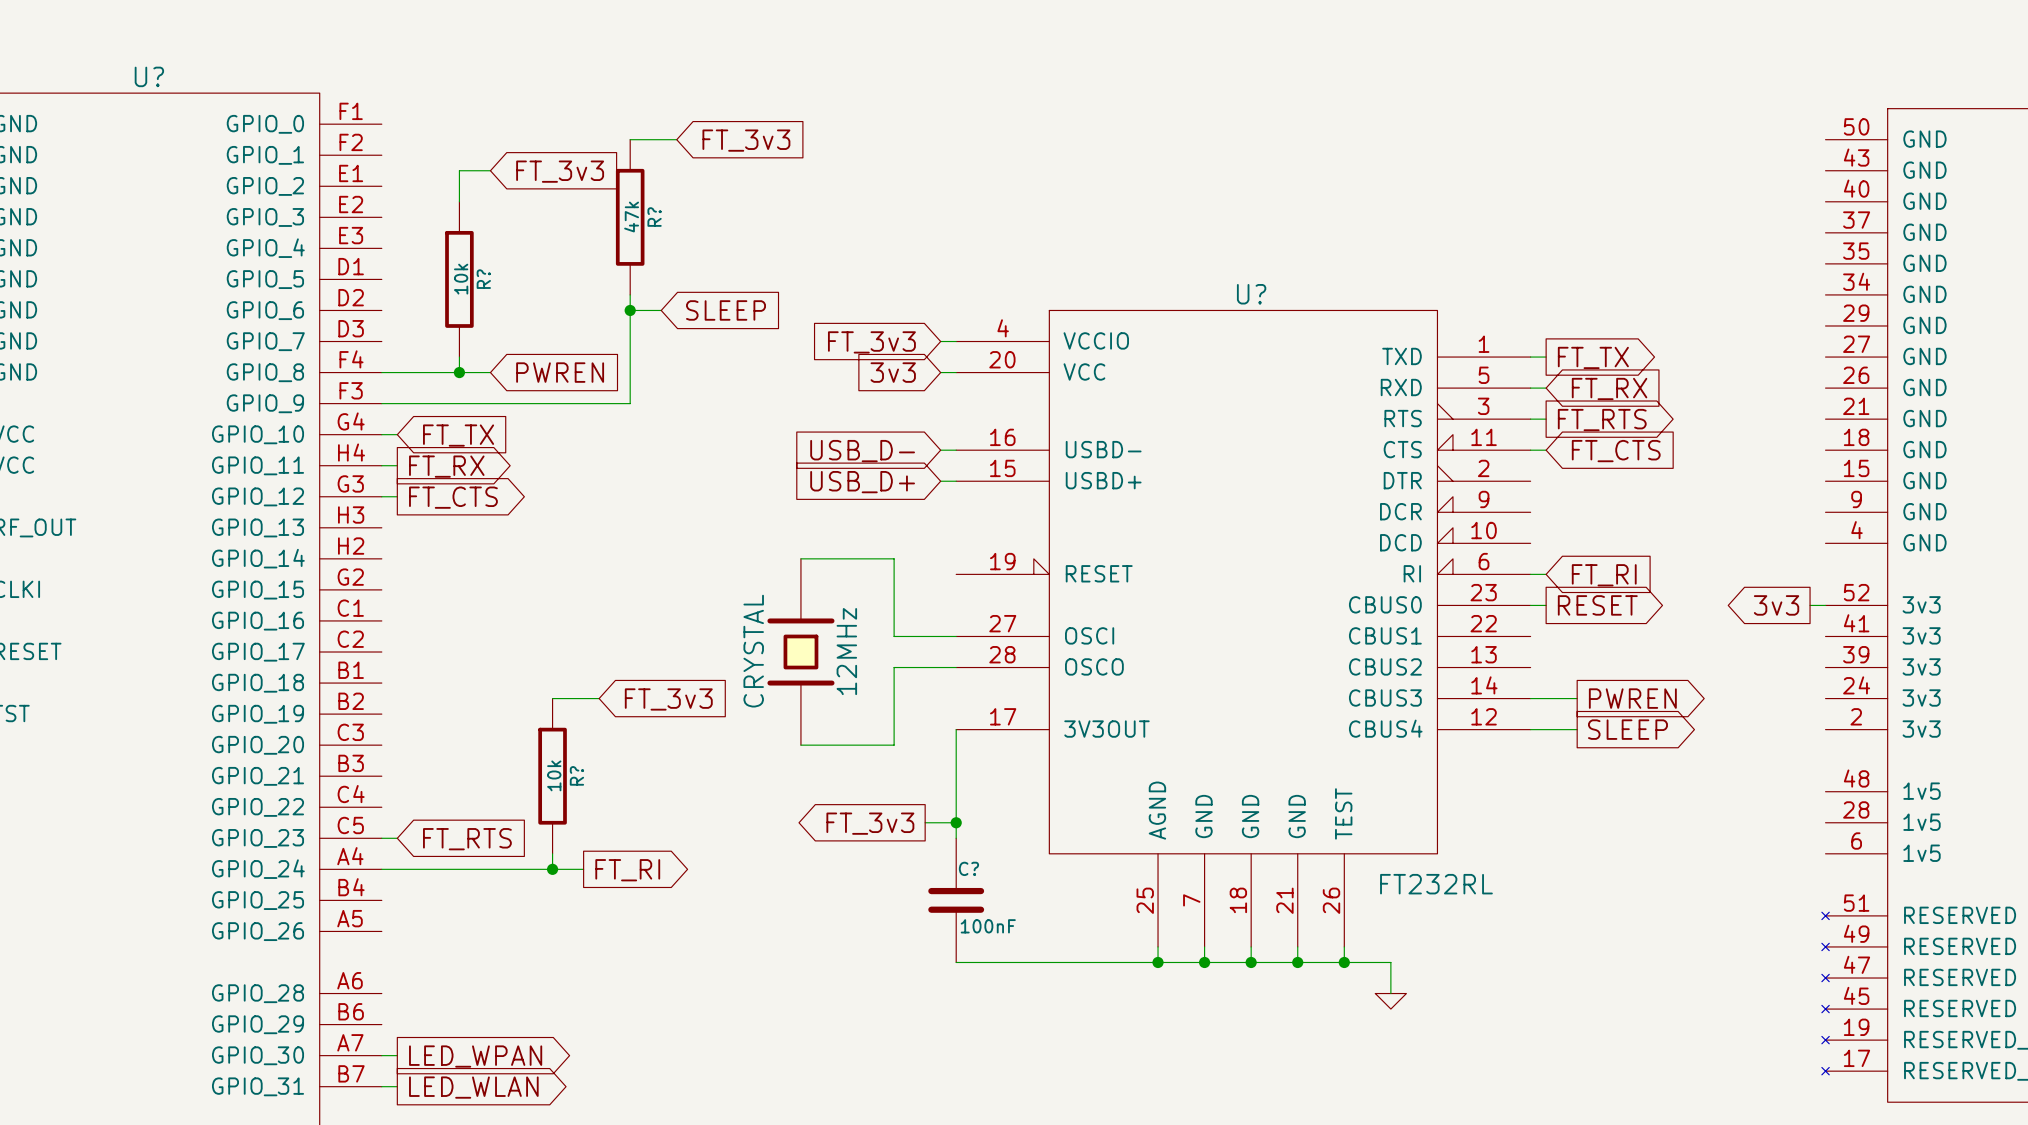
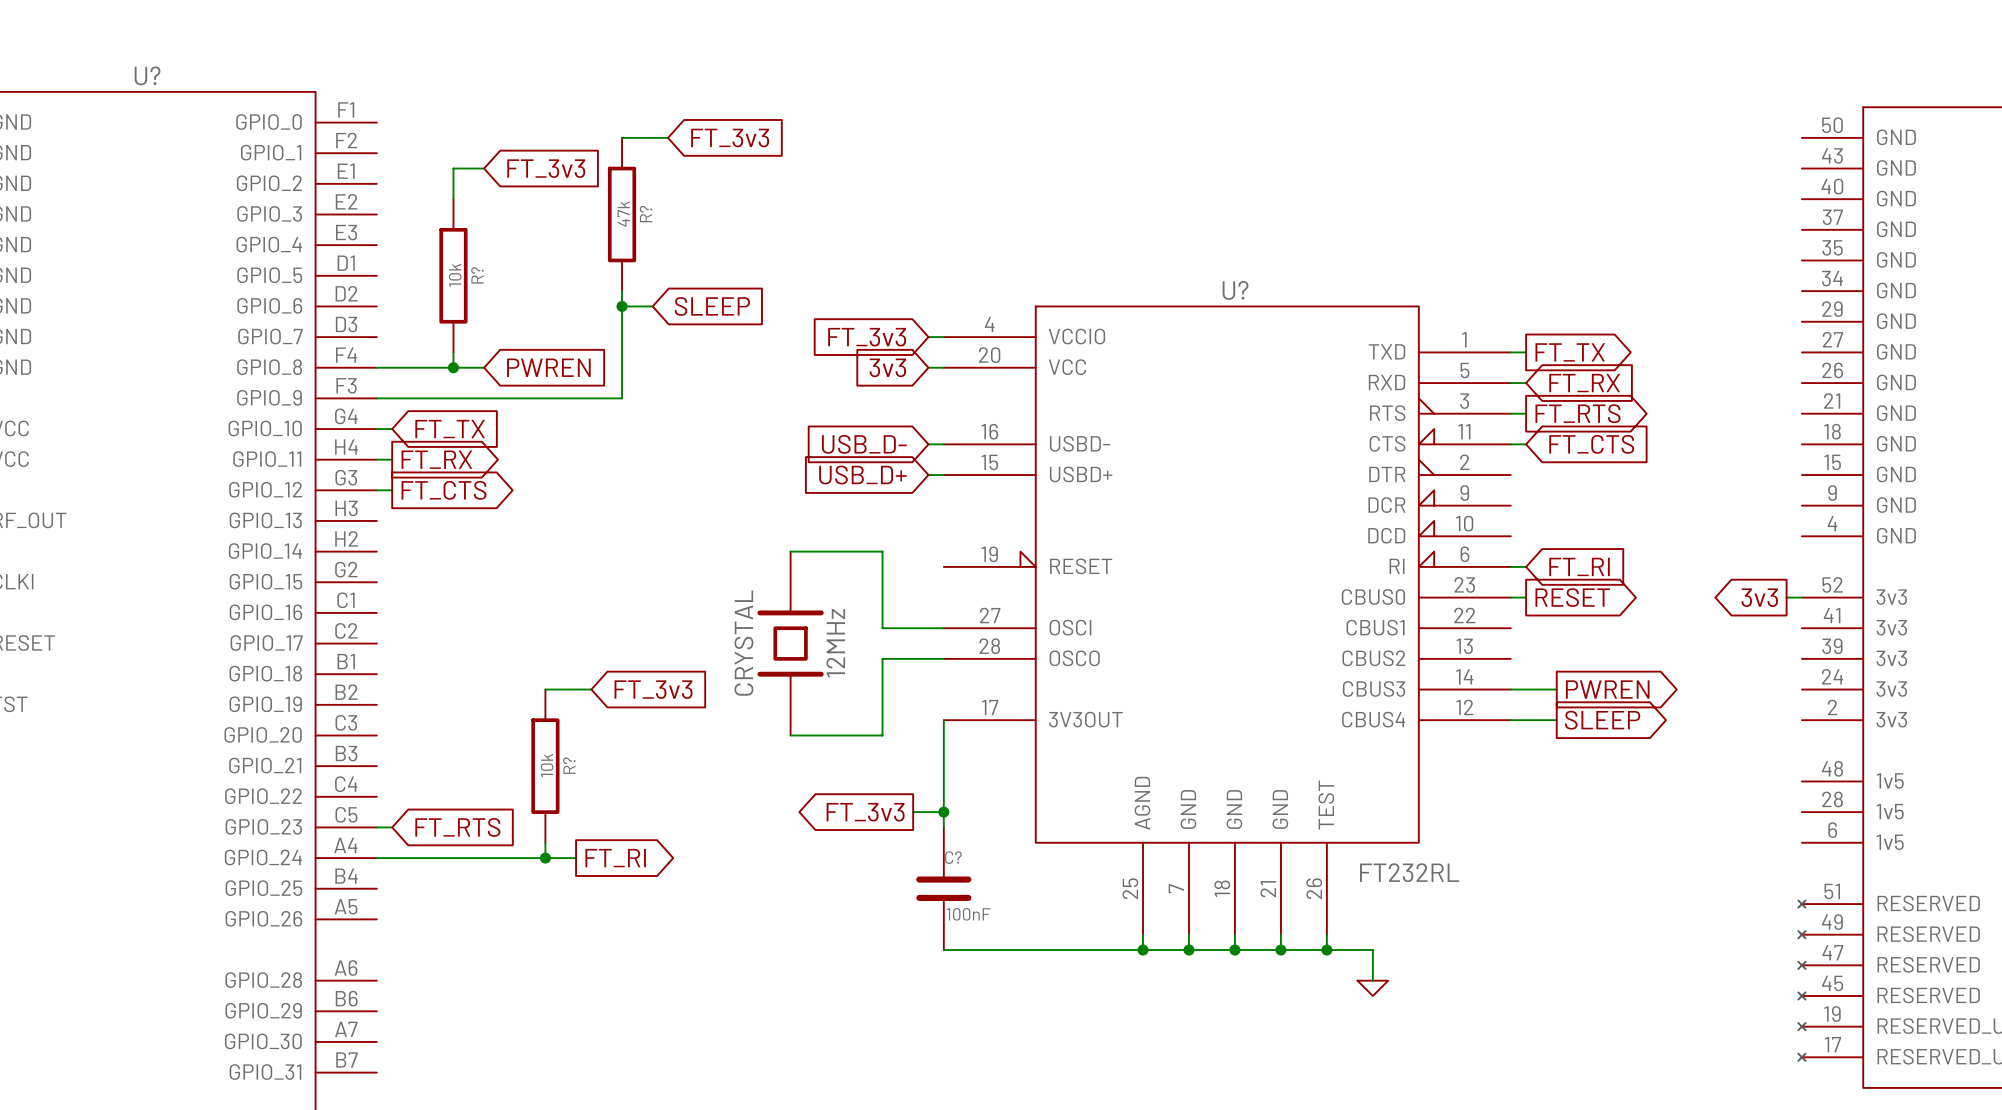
wire: (381, 1055) (397, 1055) -> none
global label: LED_WPAN (475, 1056) -> none
wire: (381, 1086) (397, 1086) -> none
global label: LED_WLAN (473, 1087) -> none

